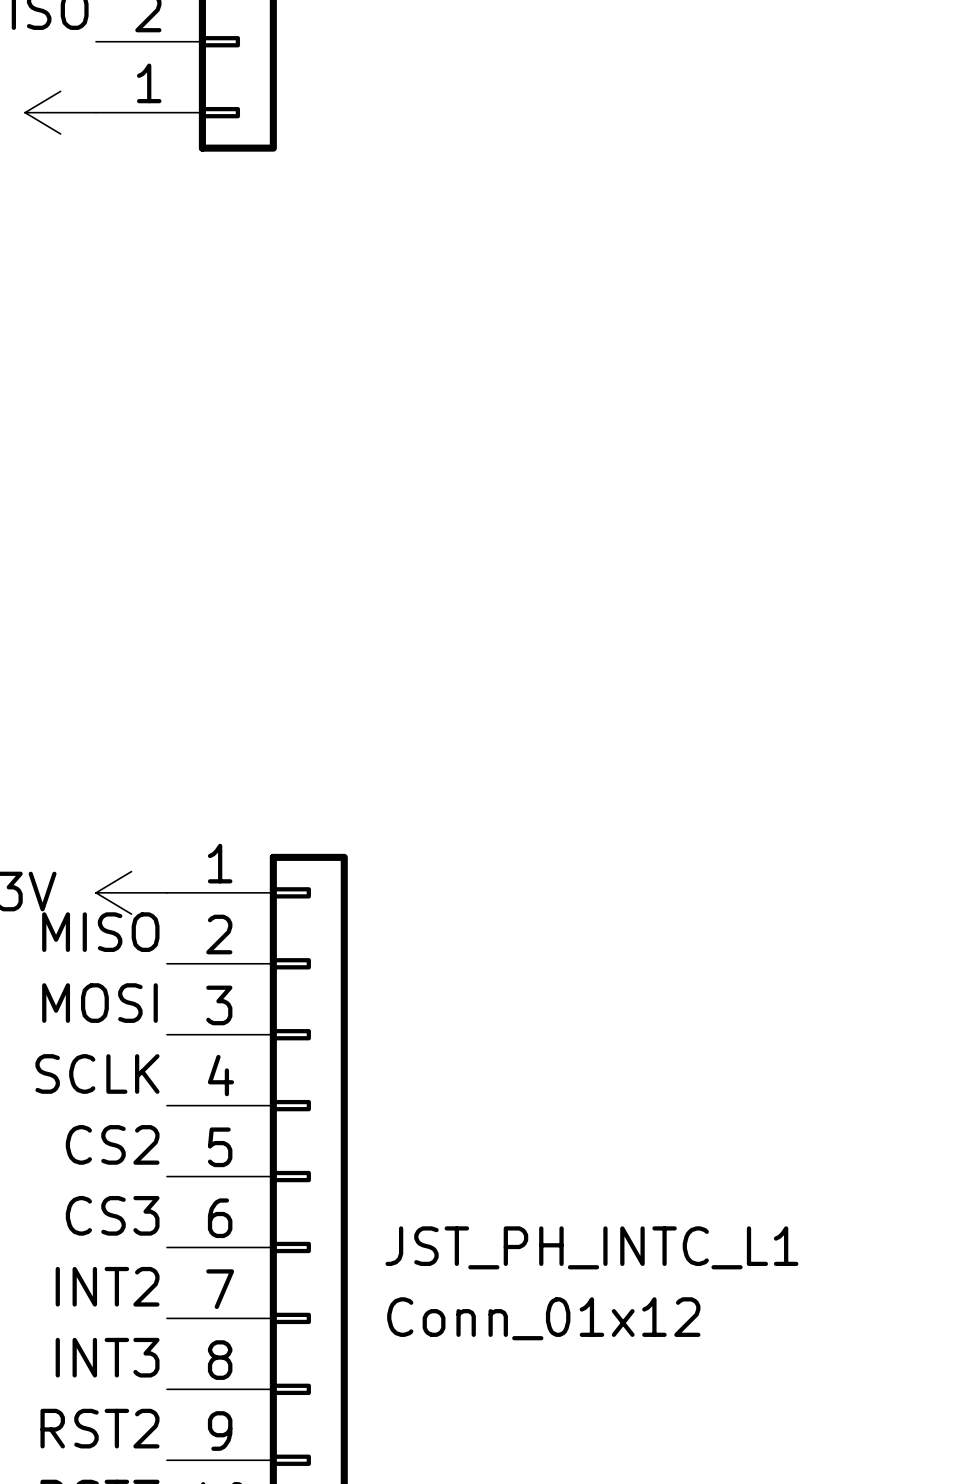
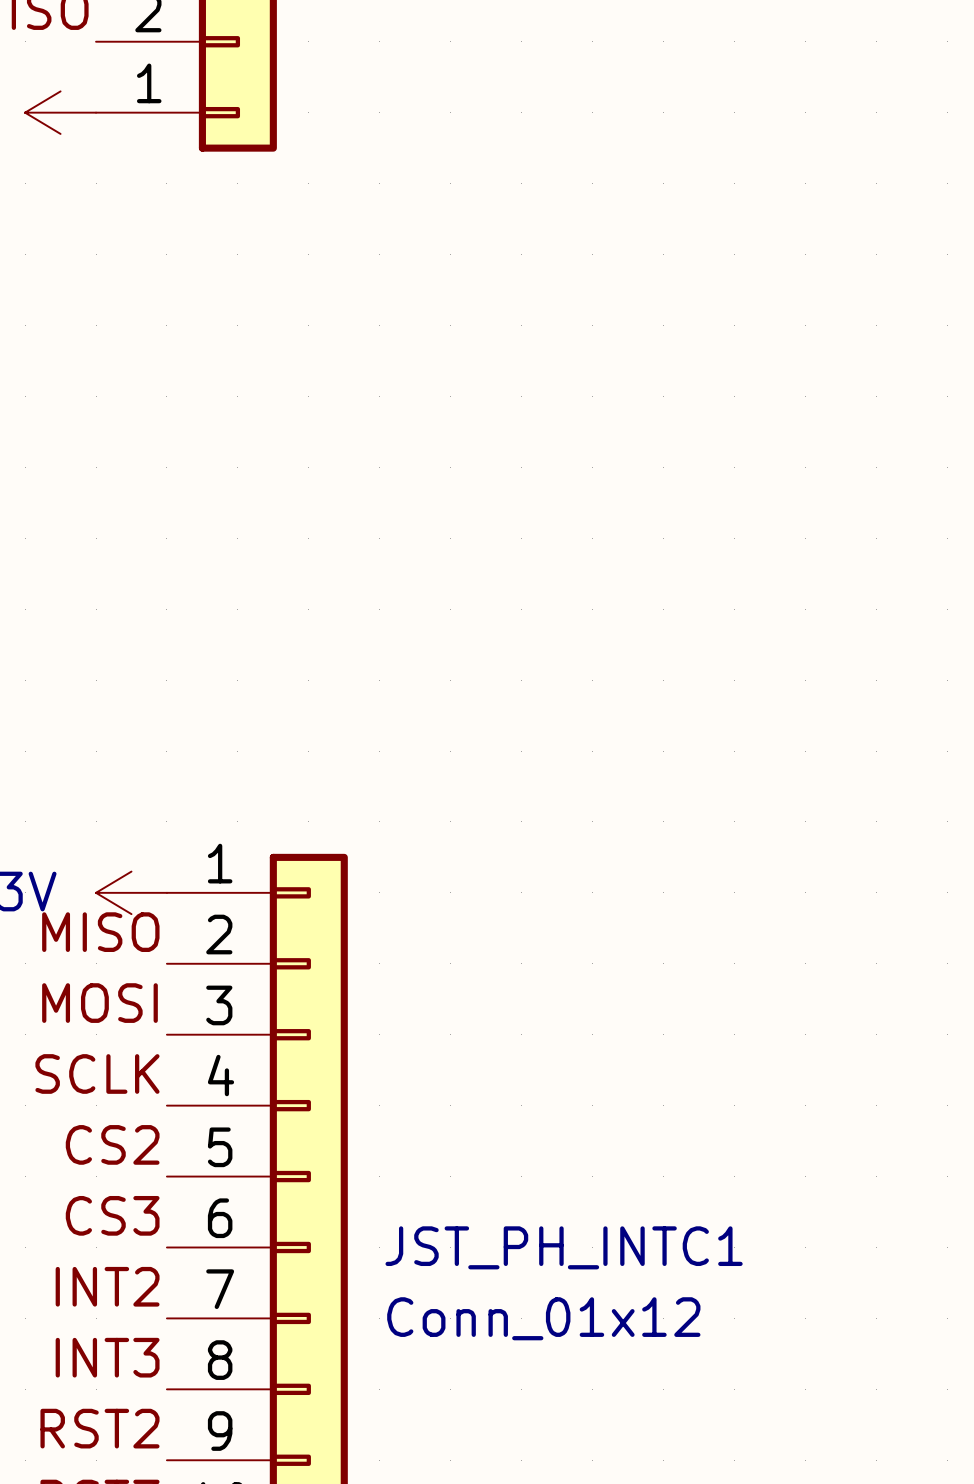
JST_PH_INTC_L1 name: JST_PH_INTC_L1 (591, 1247) -> JST_PH_INTC1 (564, 1247)

